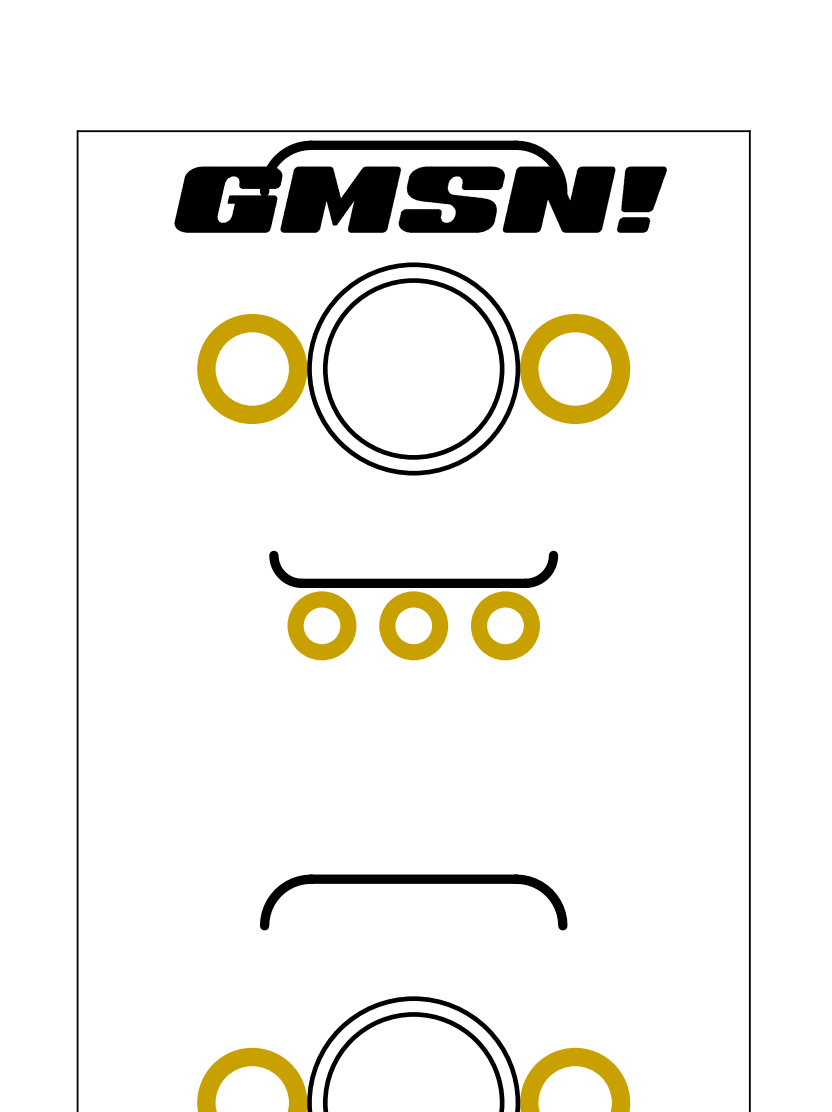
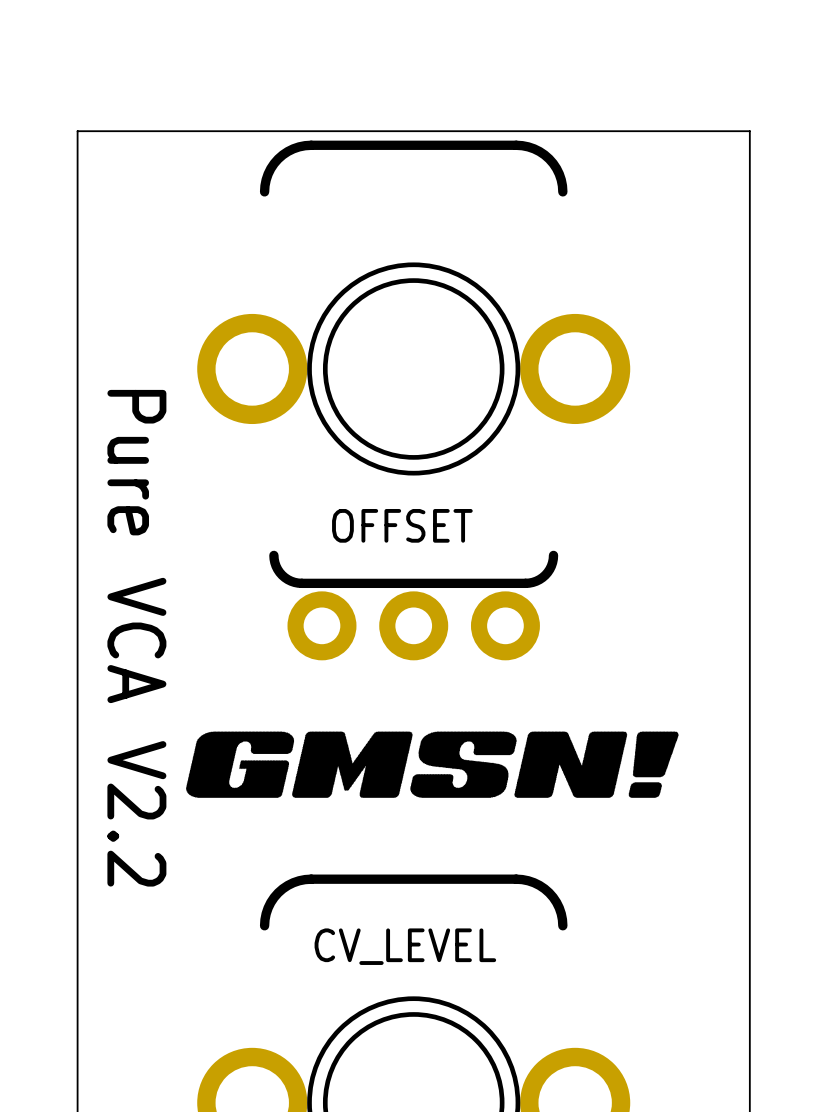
drawing position: (420, 199) -> (432, 764)
text: none -> OFFSET (402, 525)
text: none -> Pure VCA V2.2 (136, 638)
text: none -> CV_LEVEL (405, 946)

